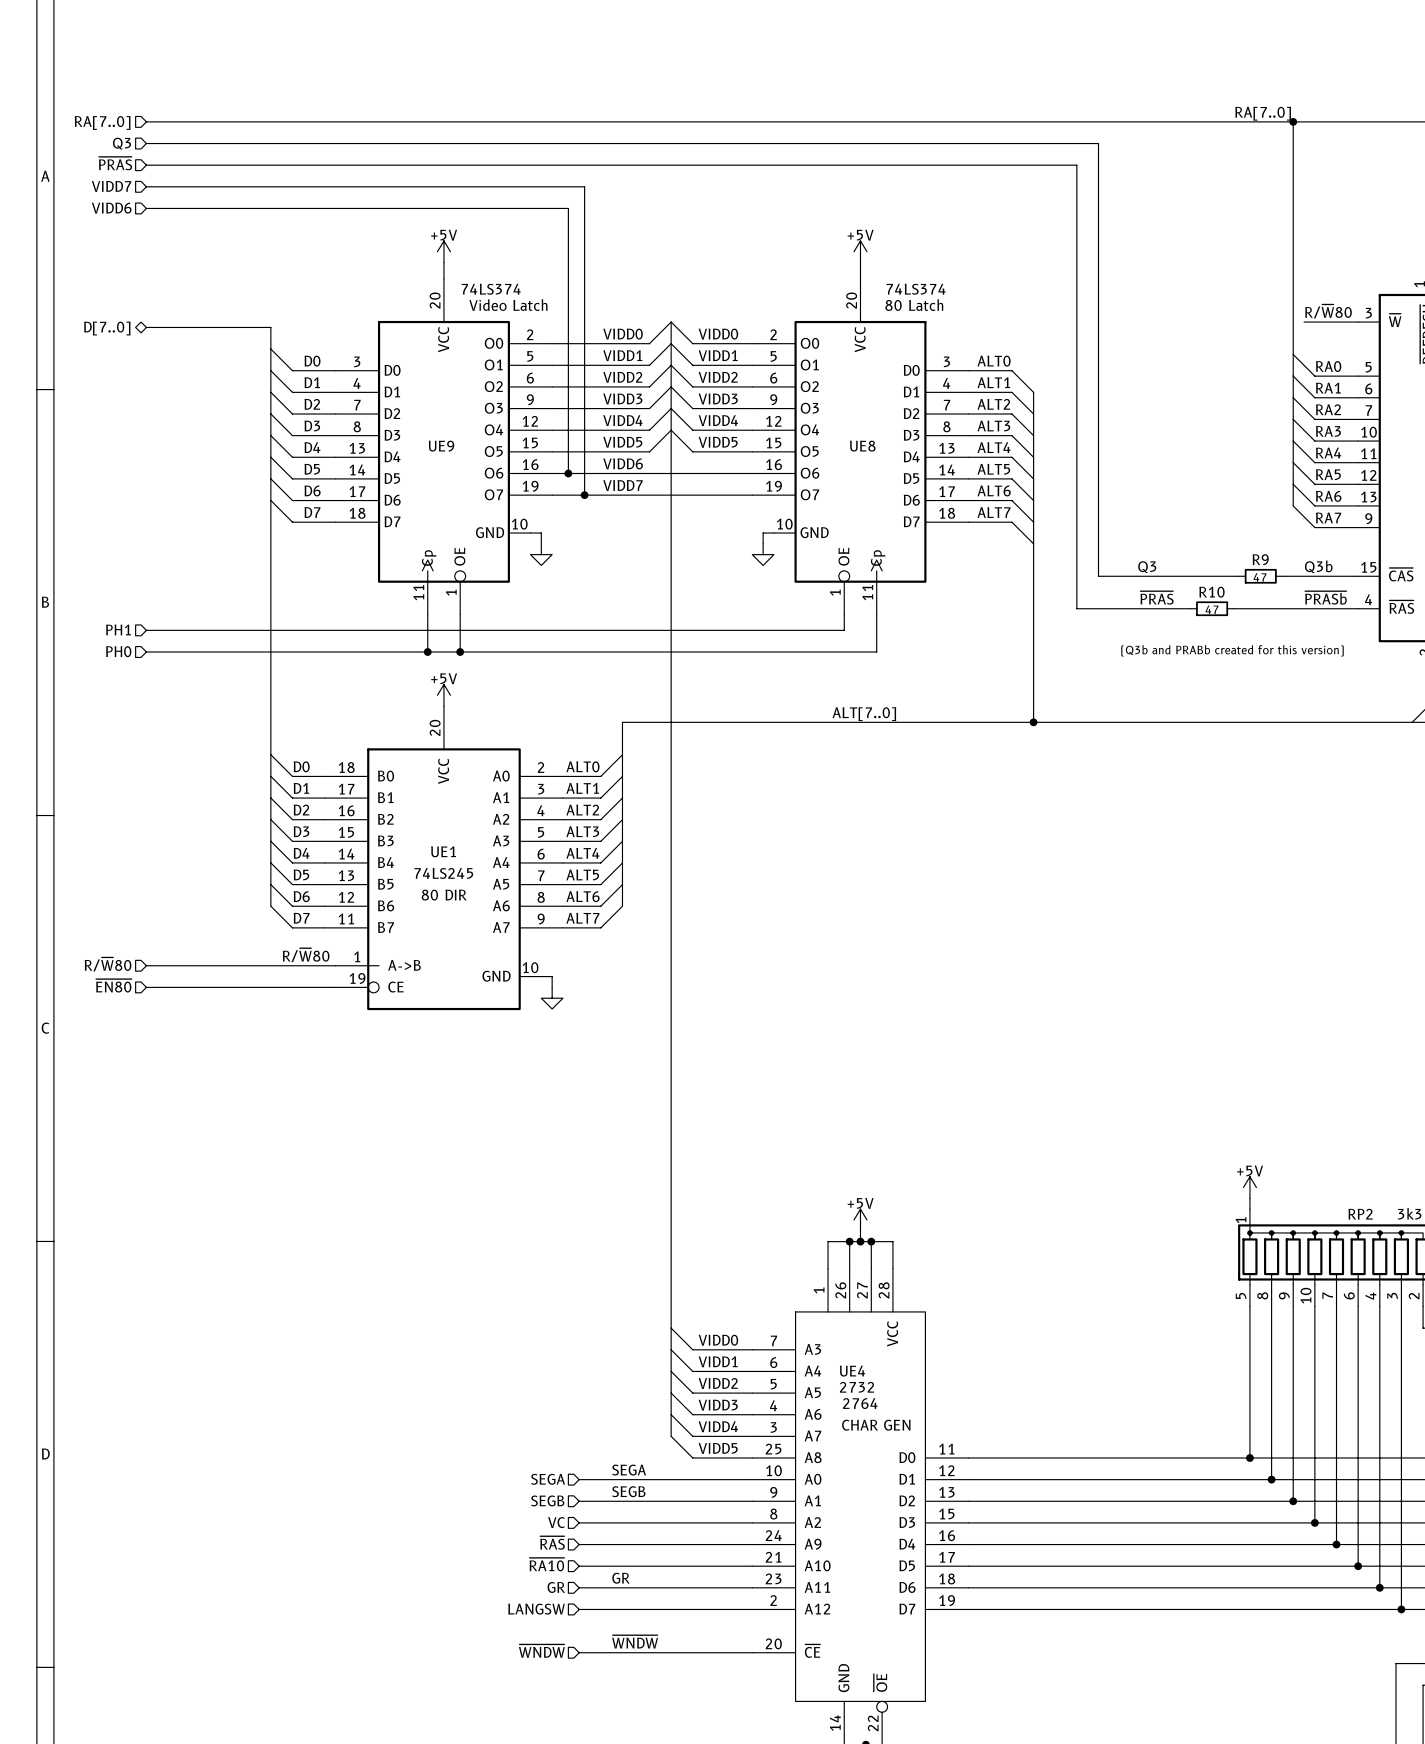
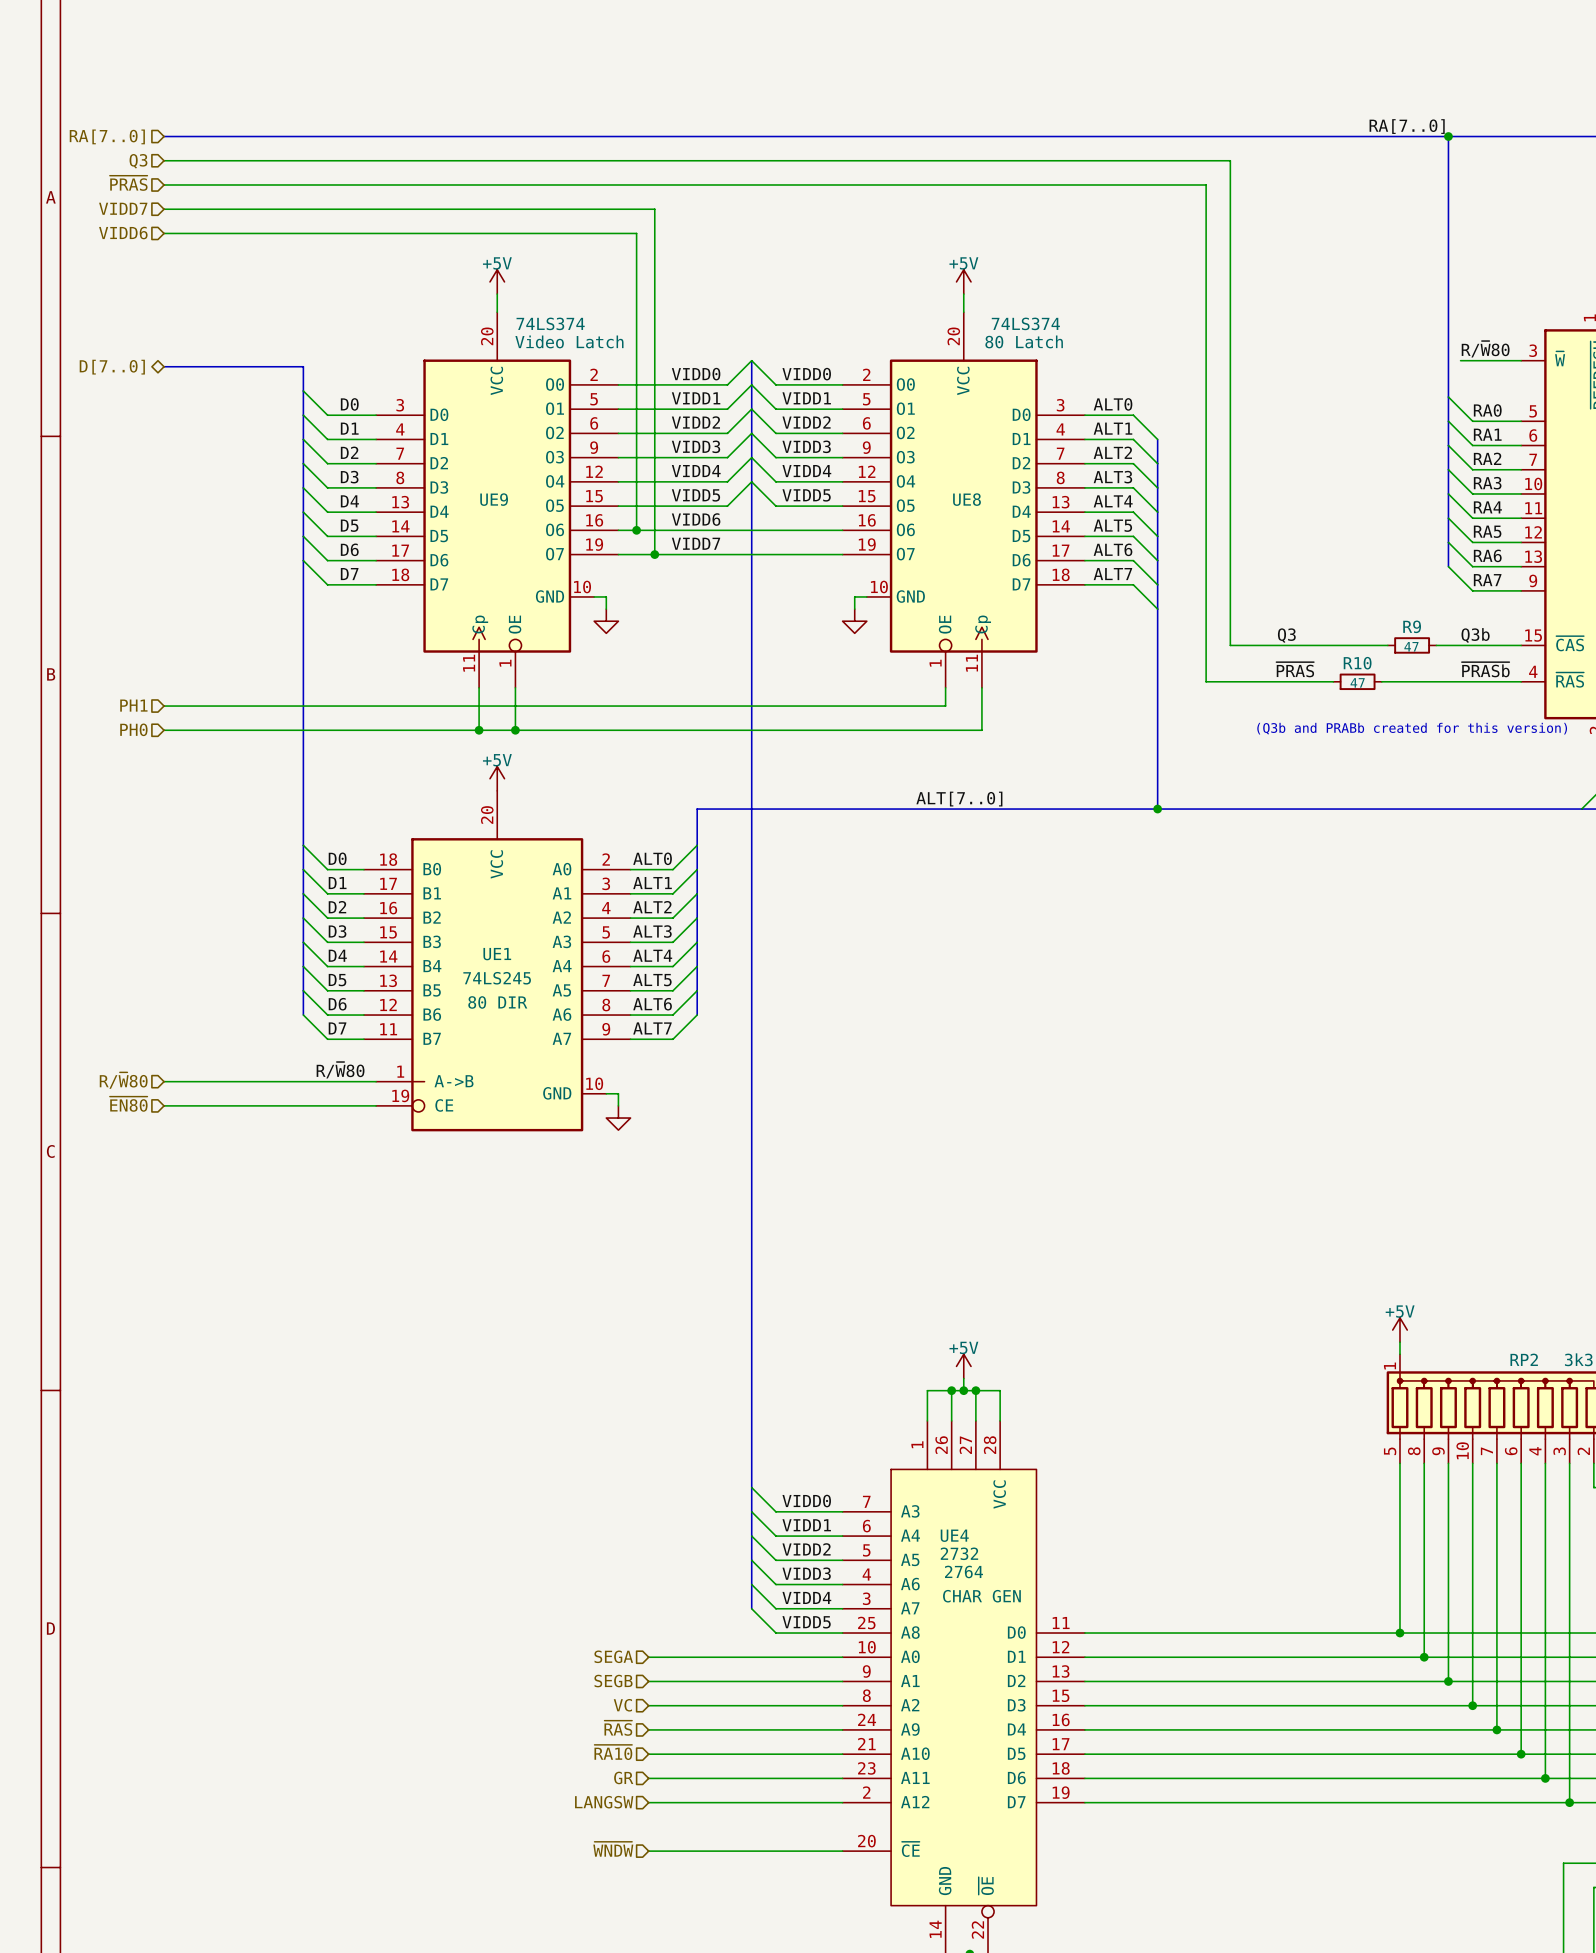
label: SEGA (629, 1470) -> none
label: SEGB (628, 1491) -> none
label: GR (620, 1578) -> none
label: ~{WNDW} (635, 1641) -> none

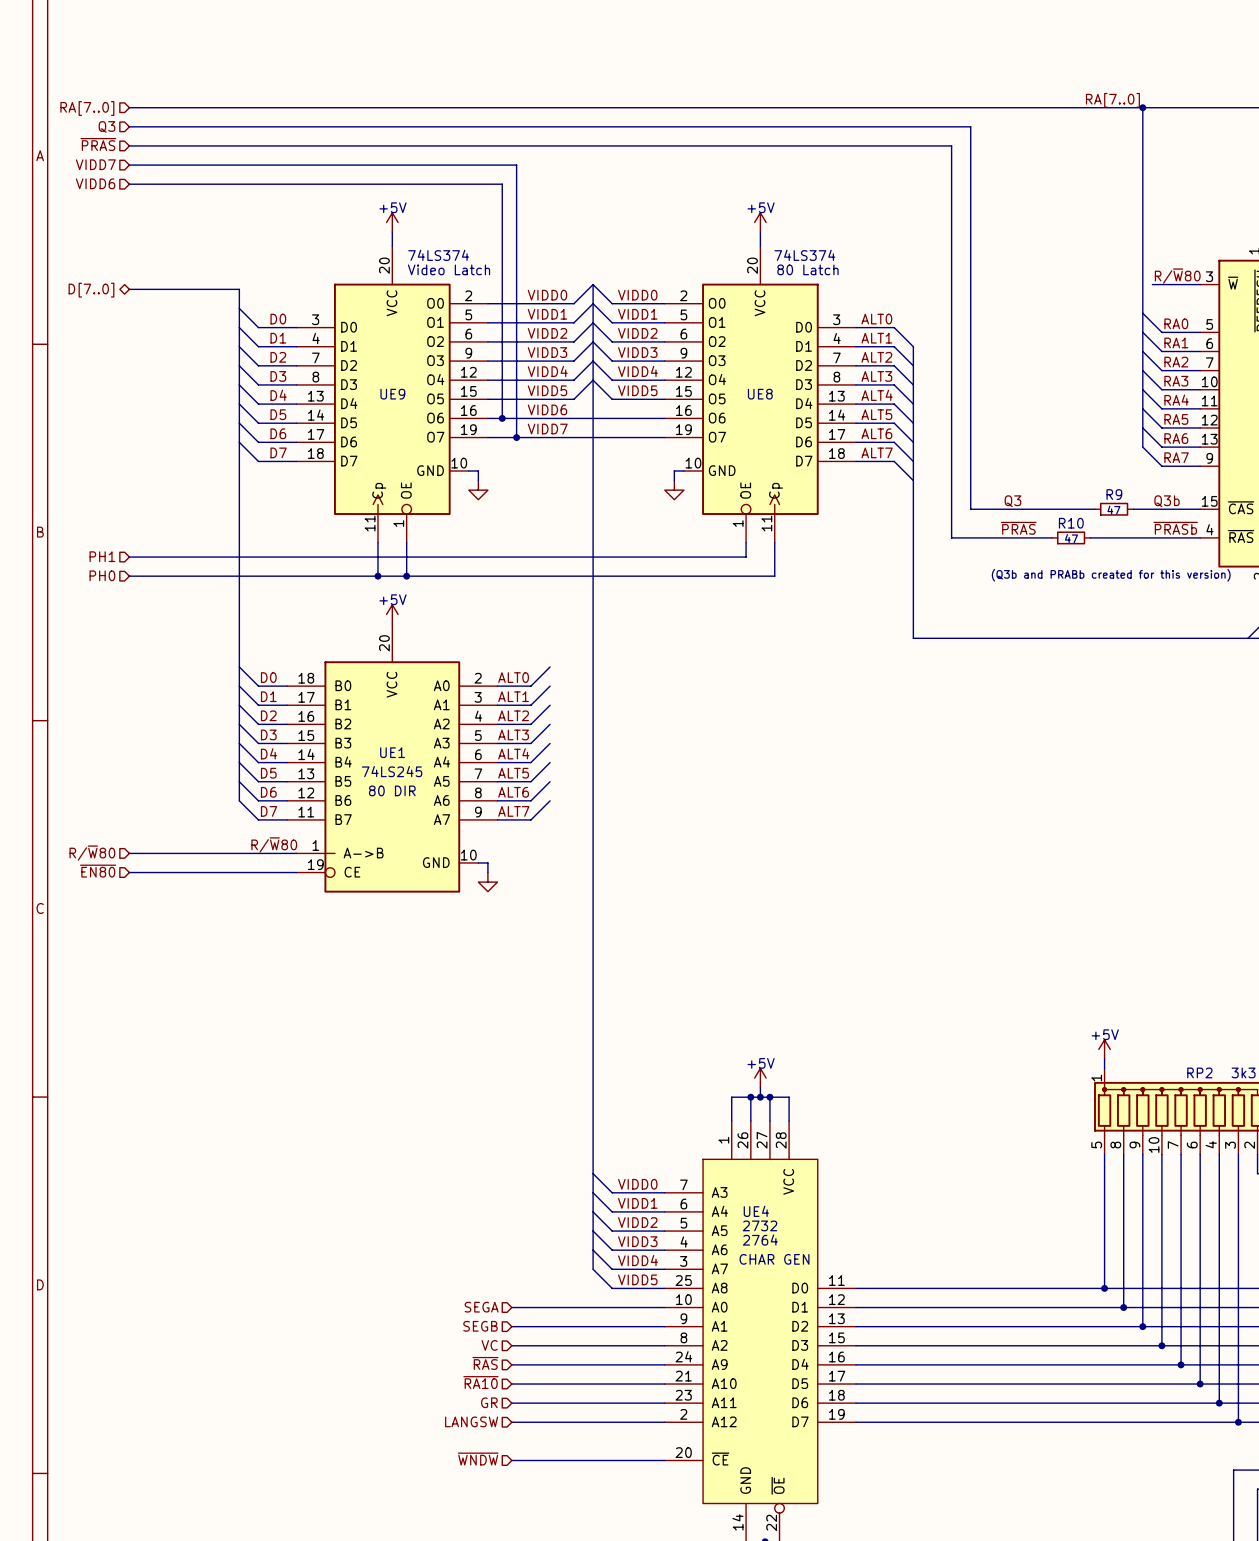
label: ALT[7..0] (959, 799) -> none
bus: (1157, 809) (697, 809) (697, 1015) -> none
junction: (1157, 809) -> none

